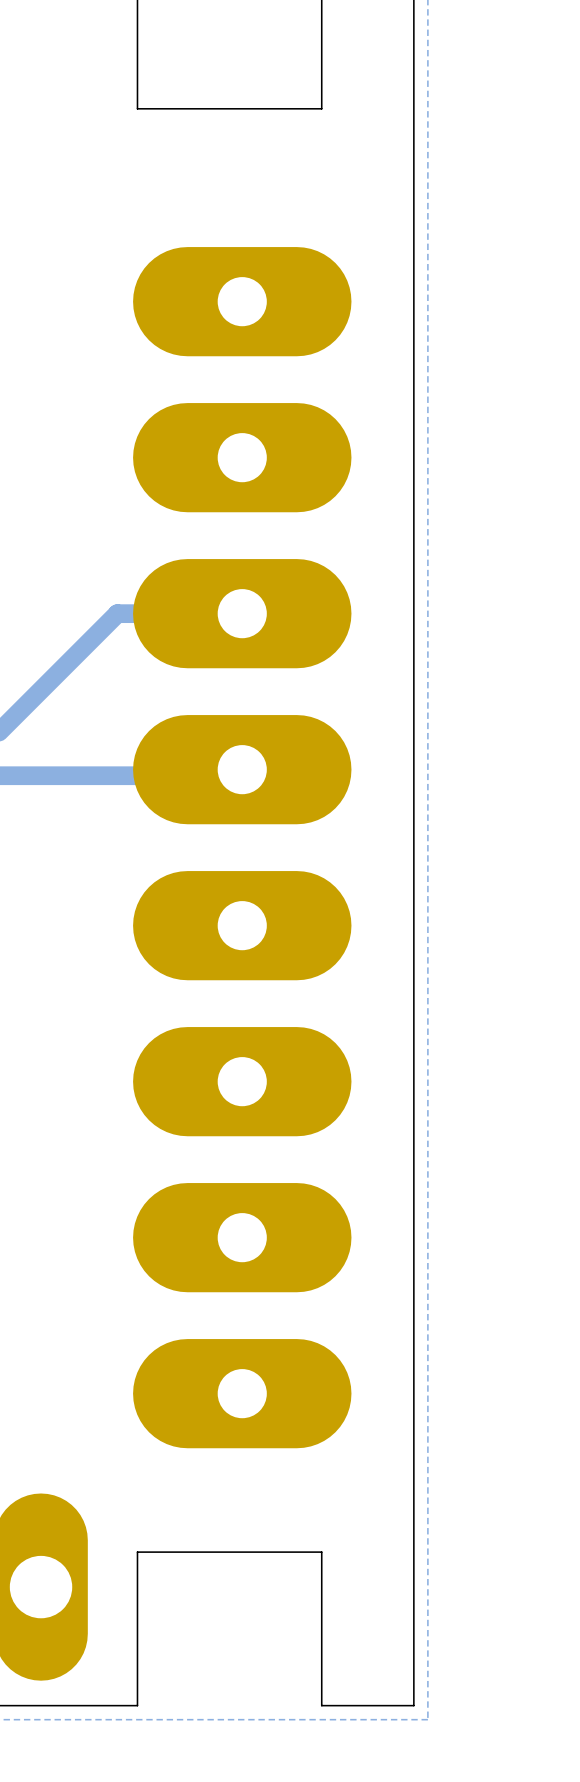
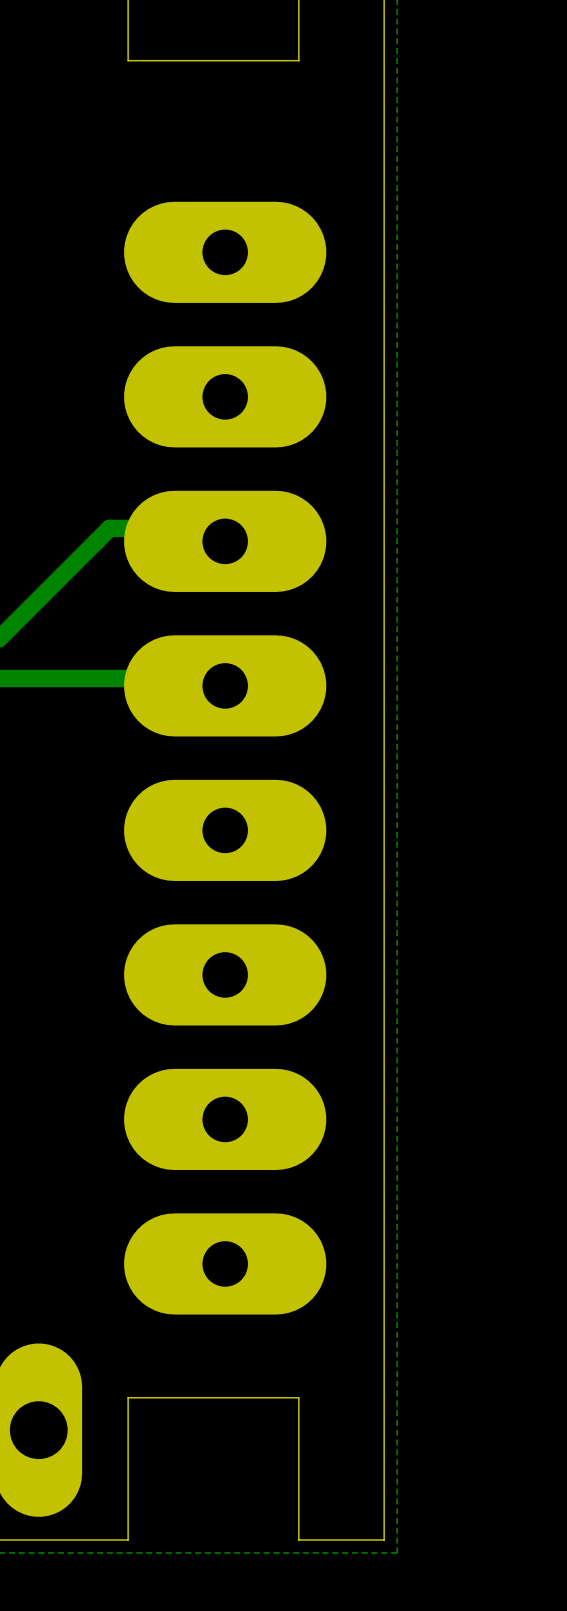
part position: (242, 847) -> (225, 758)

